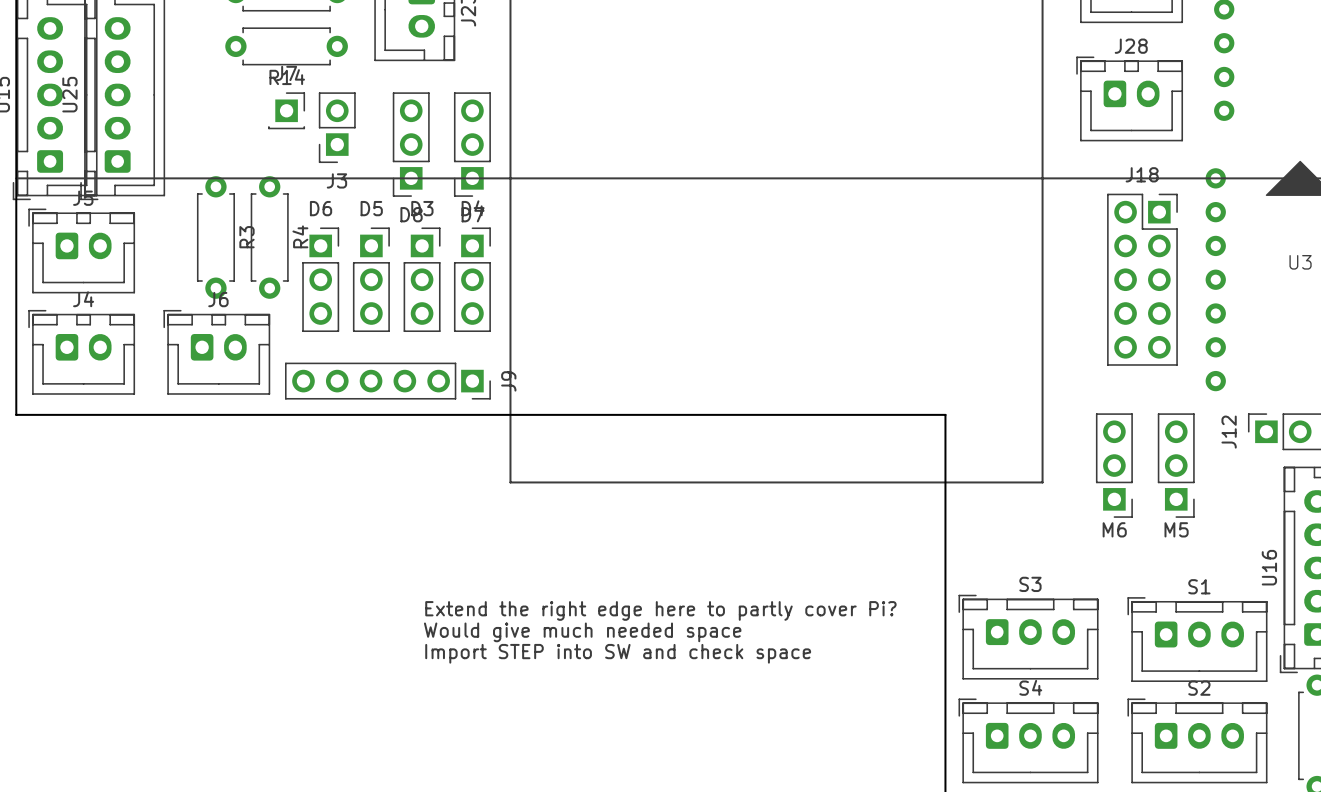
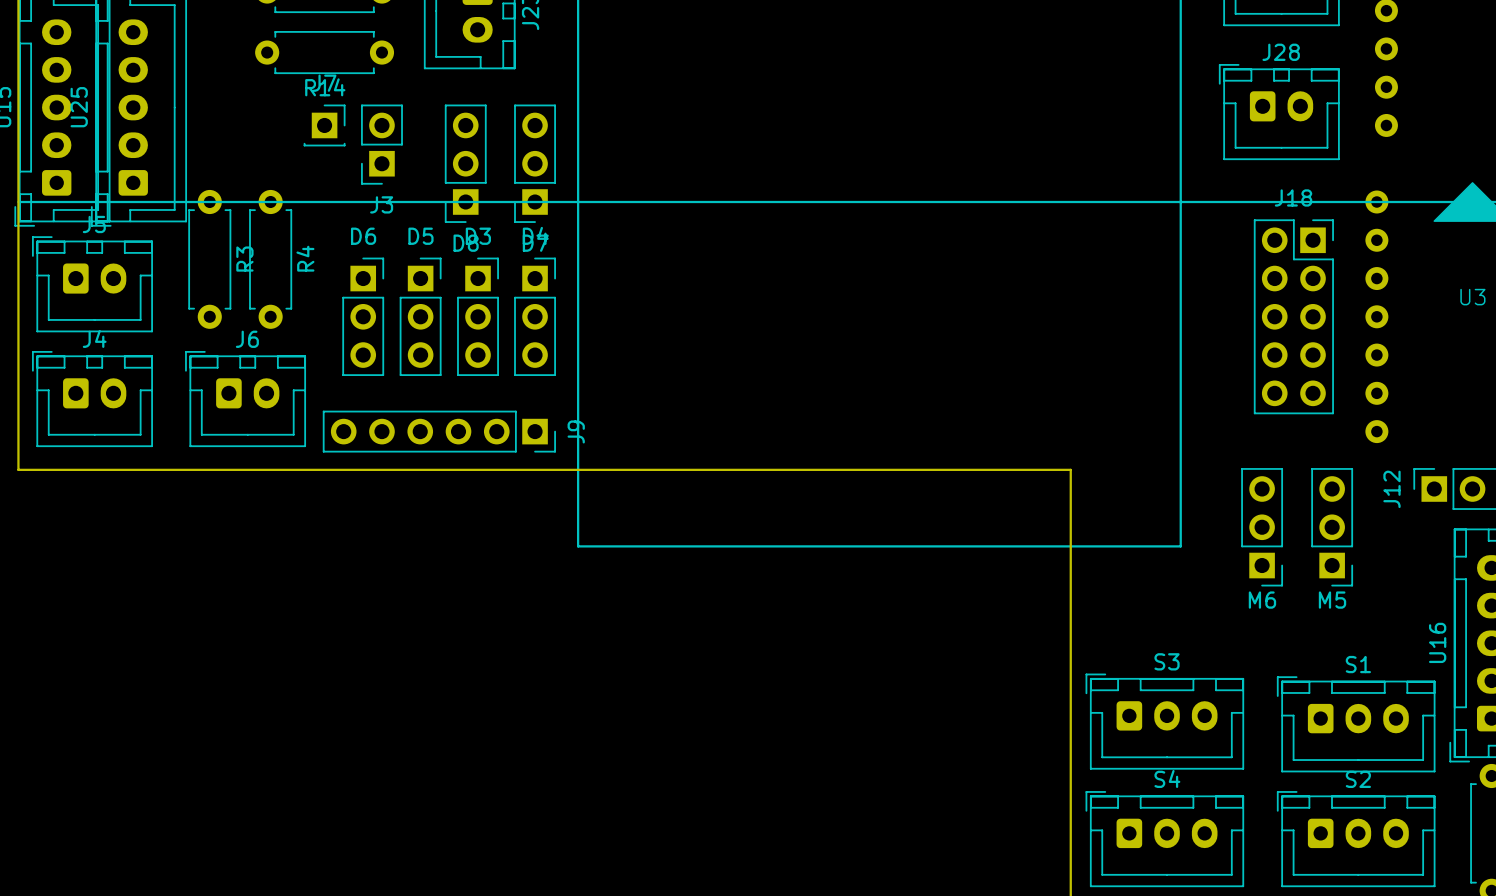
R3 position: (215, 237) -> (209, 259)
R4 position: (269, 237) -> (270, 259)
text: Extend the right edge here to partly cover Pi? (660, 610) -> none
text: Would give much needed space (582, 632) -> none
text: Import STEP into SW and check space (618, 653) -> none

